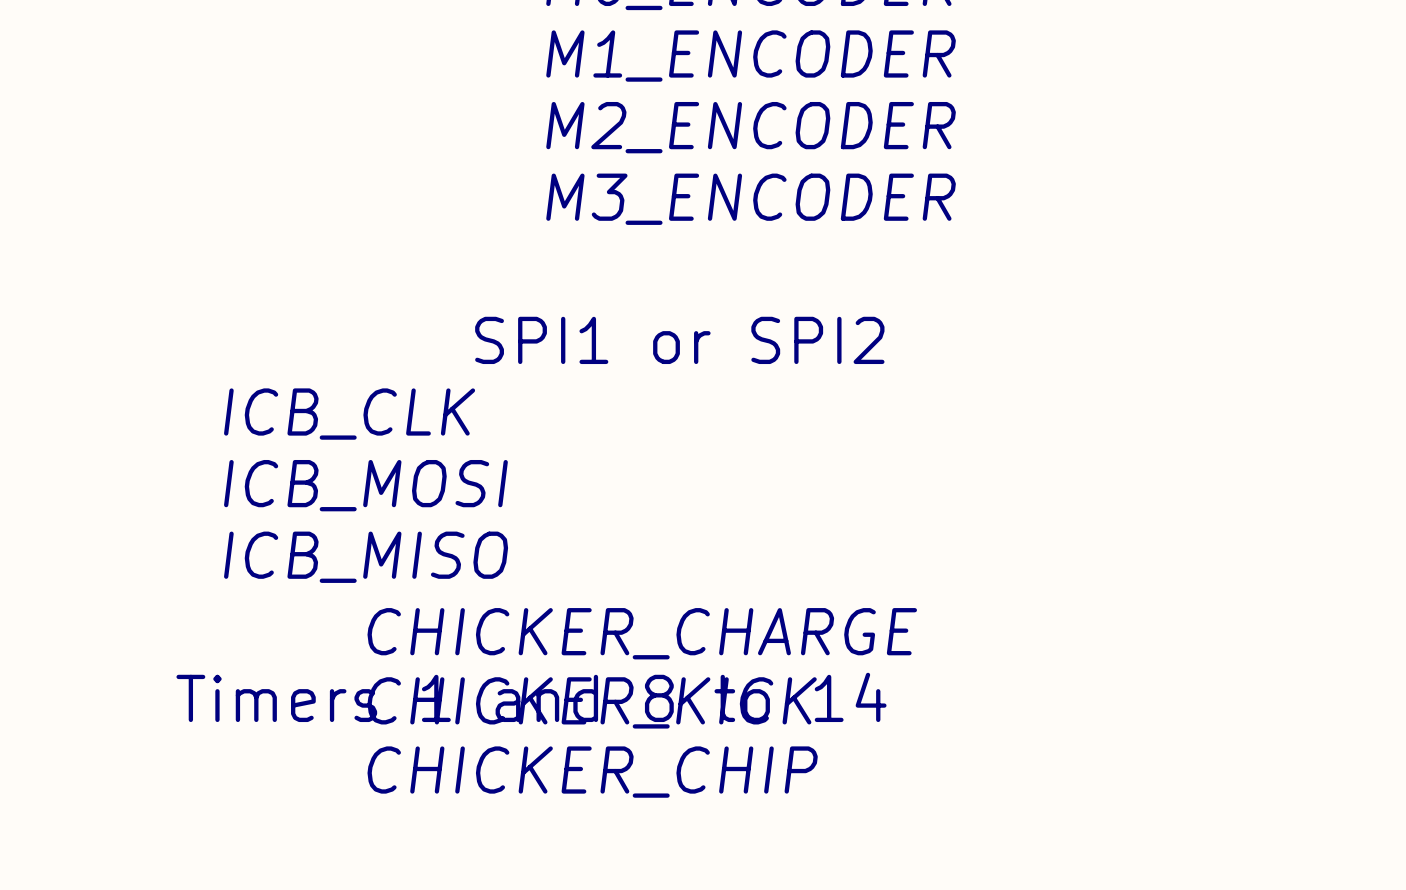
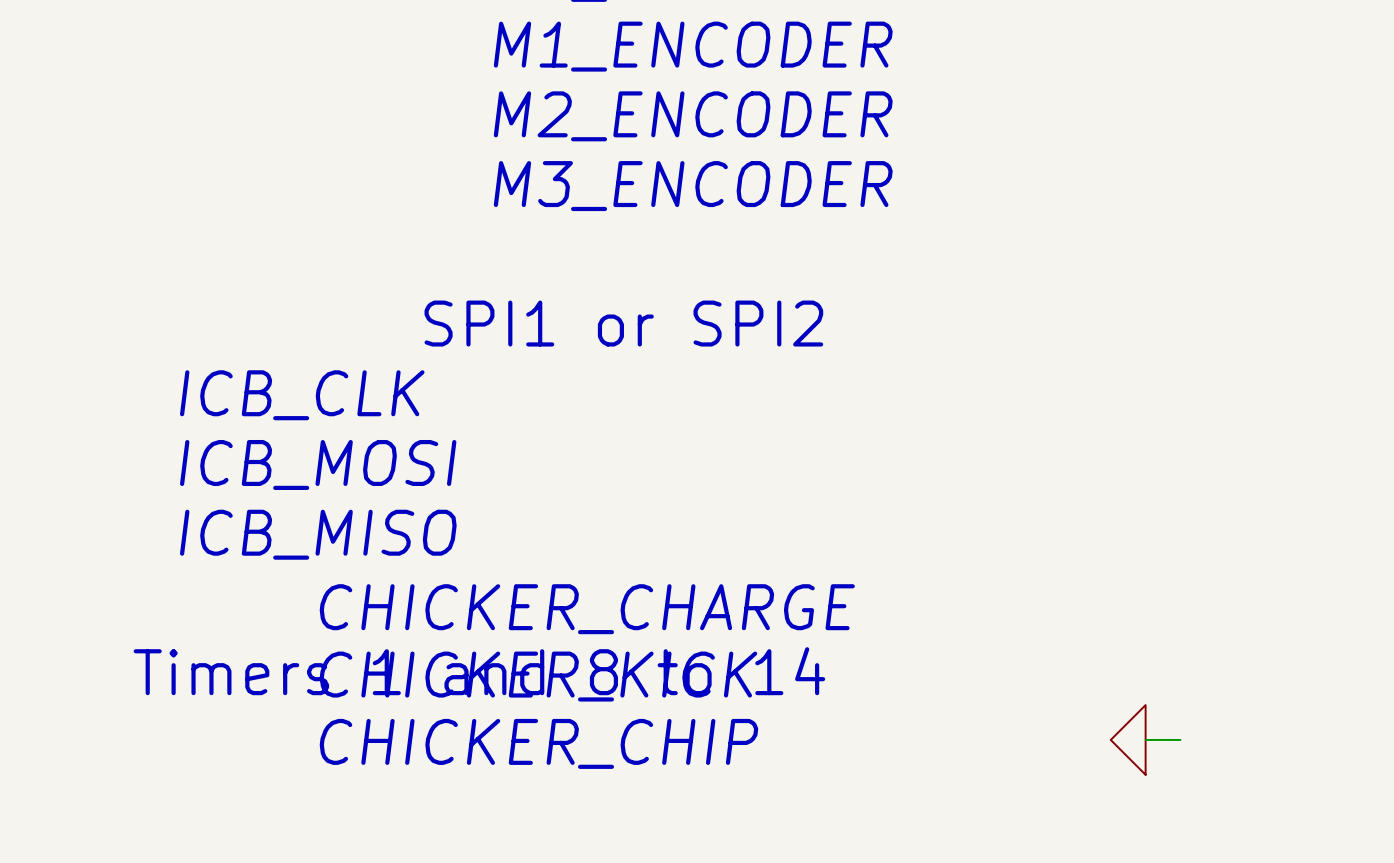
power symbol: none -> (1128, 739)
wire: none -> (1145, 739) (1180, 739)

